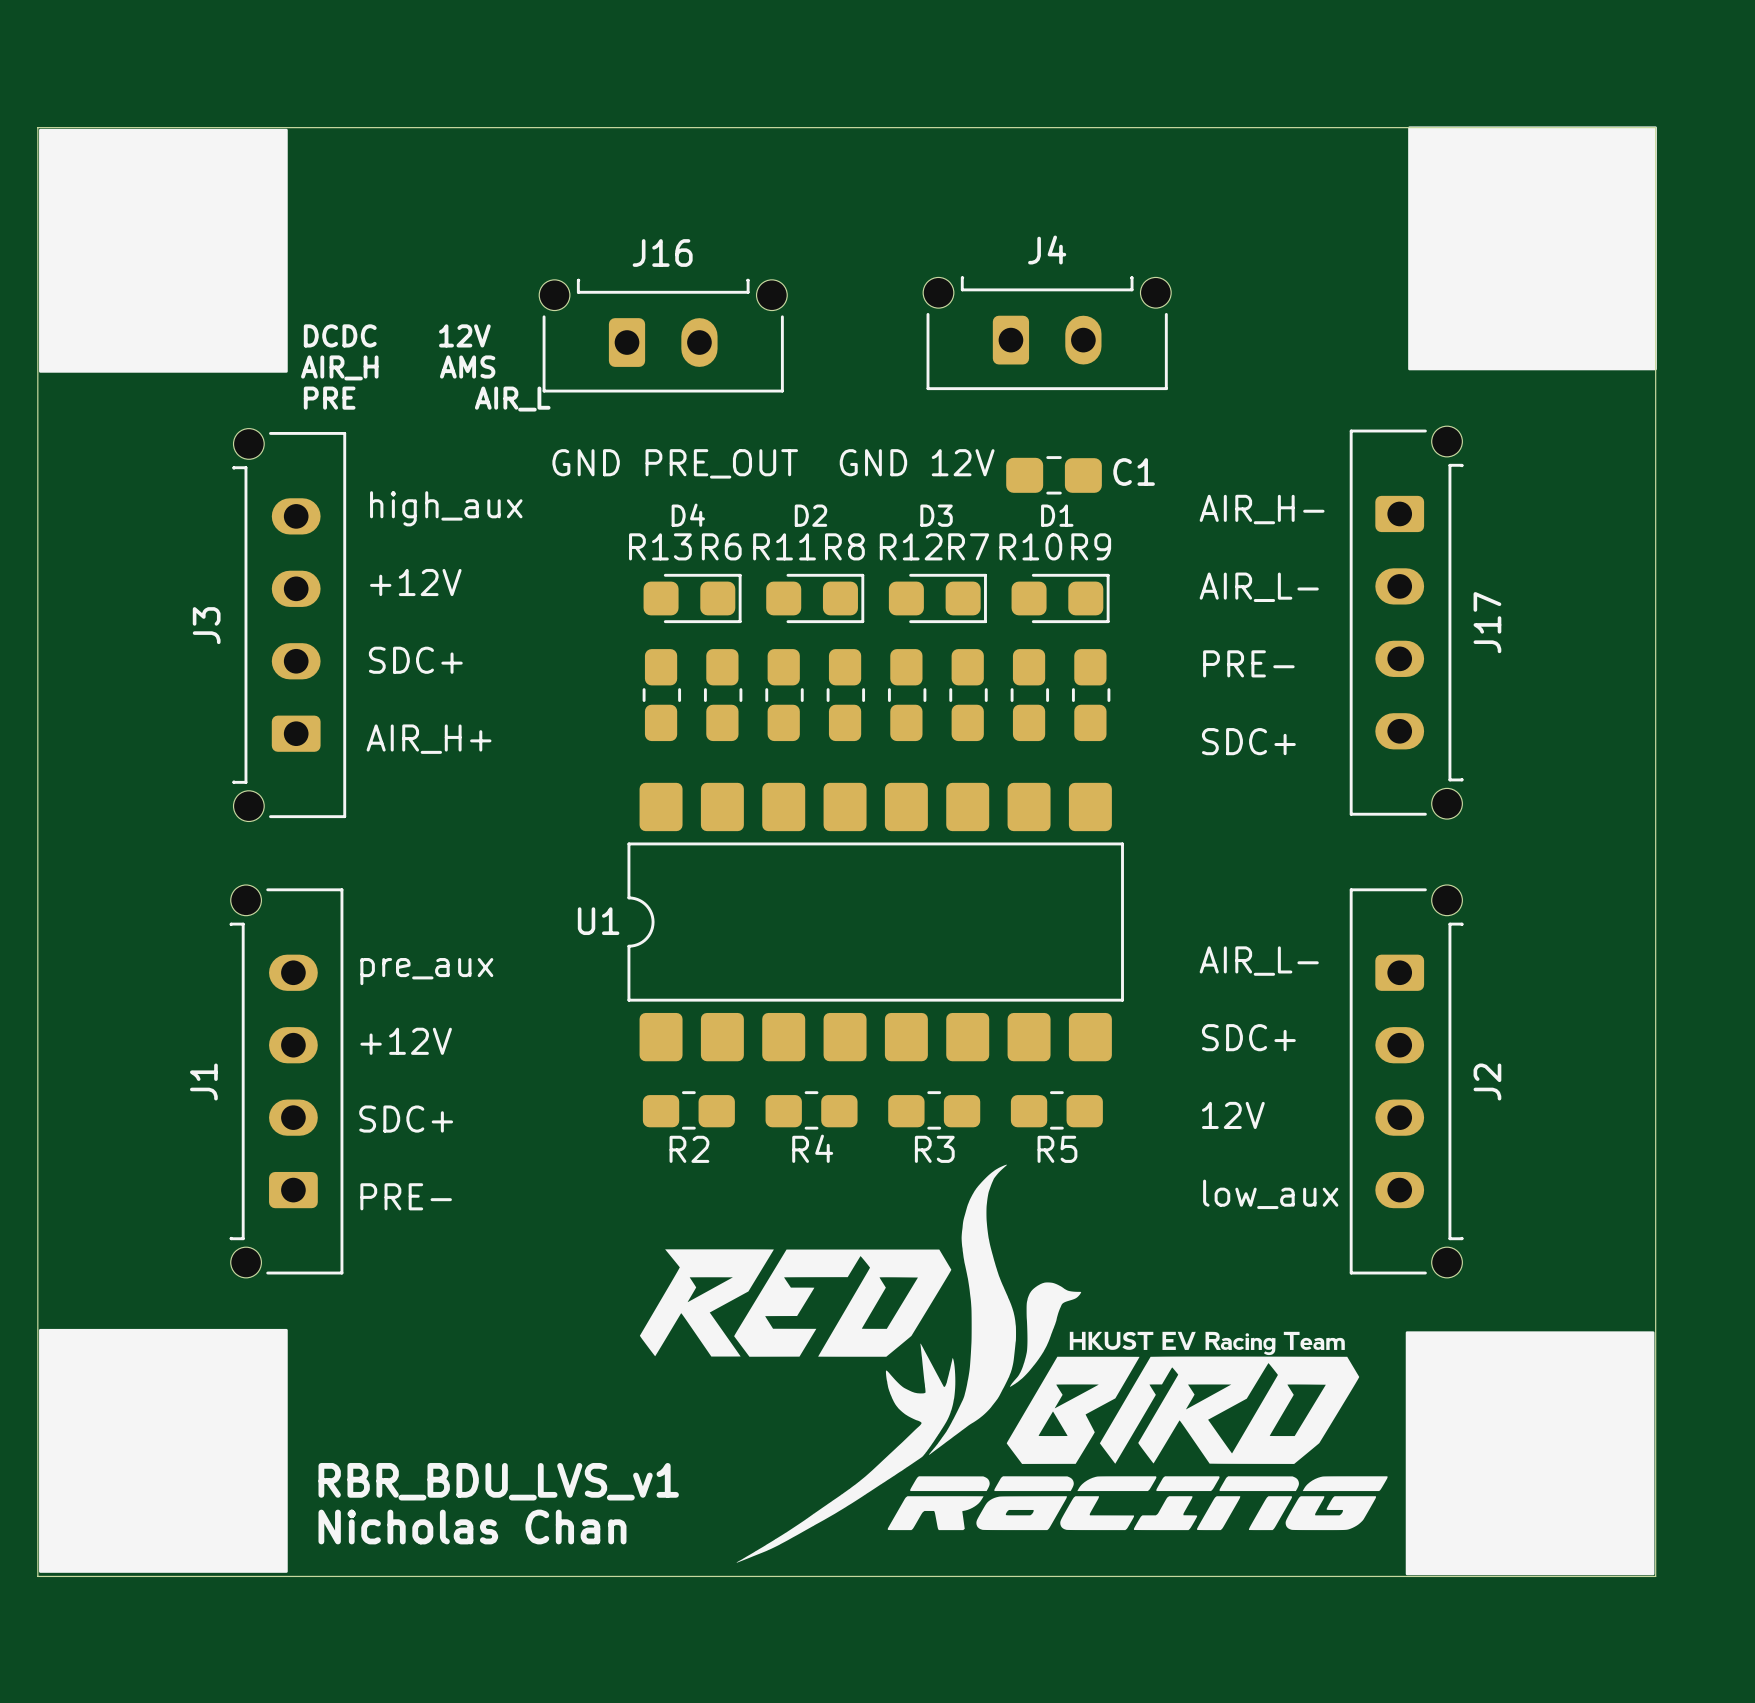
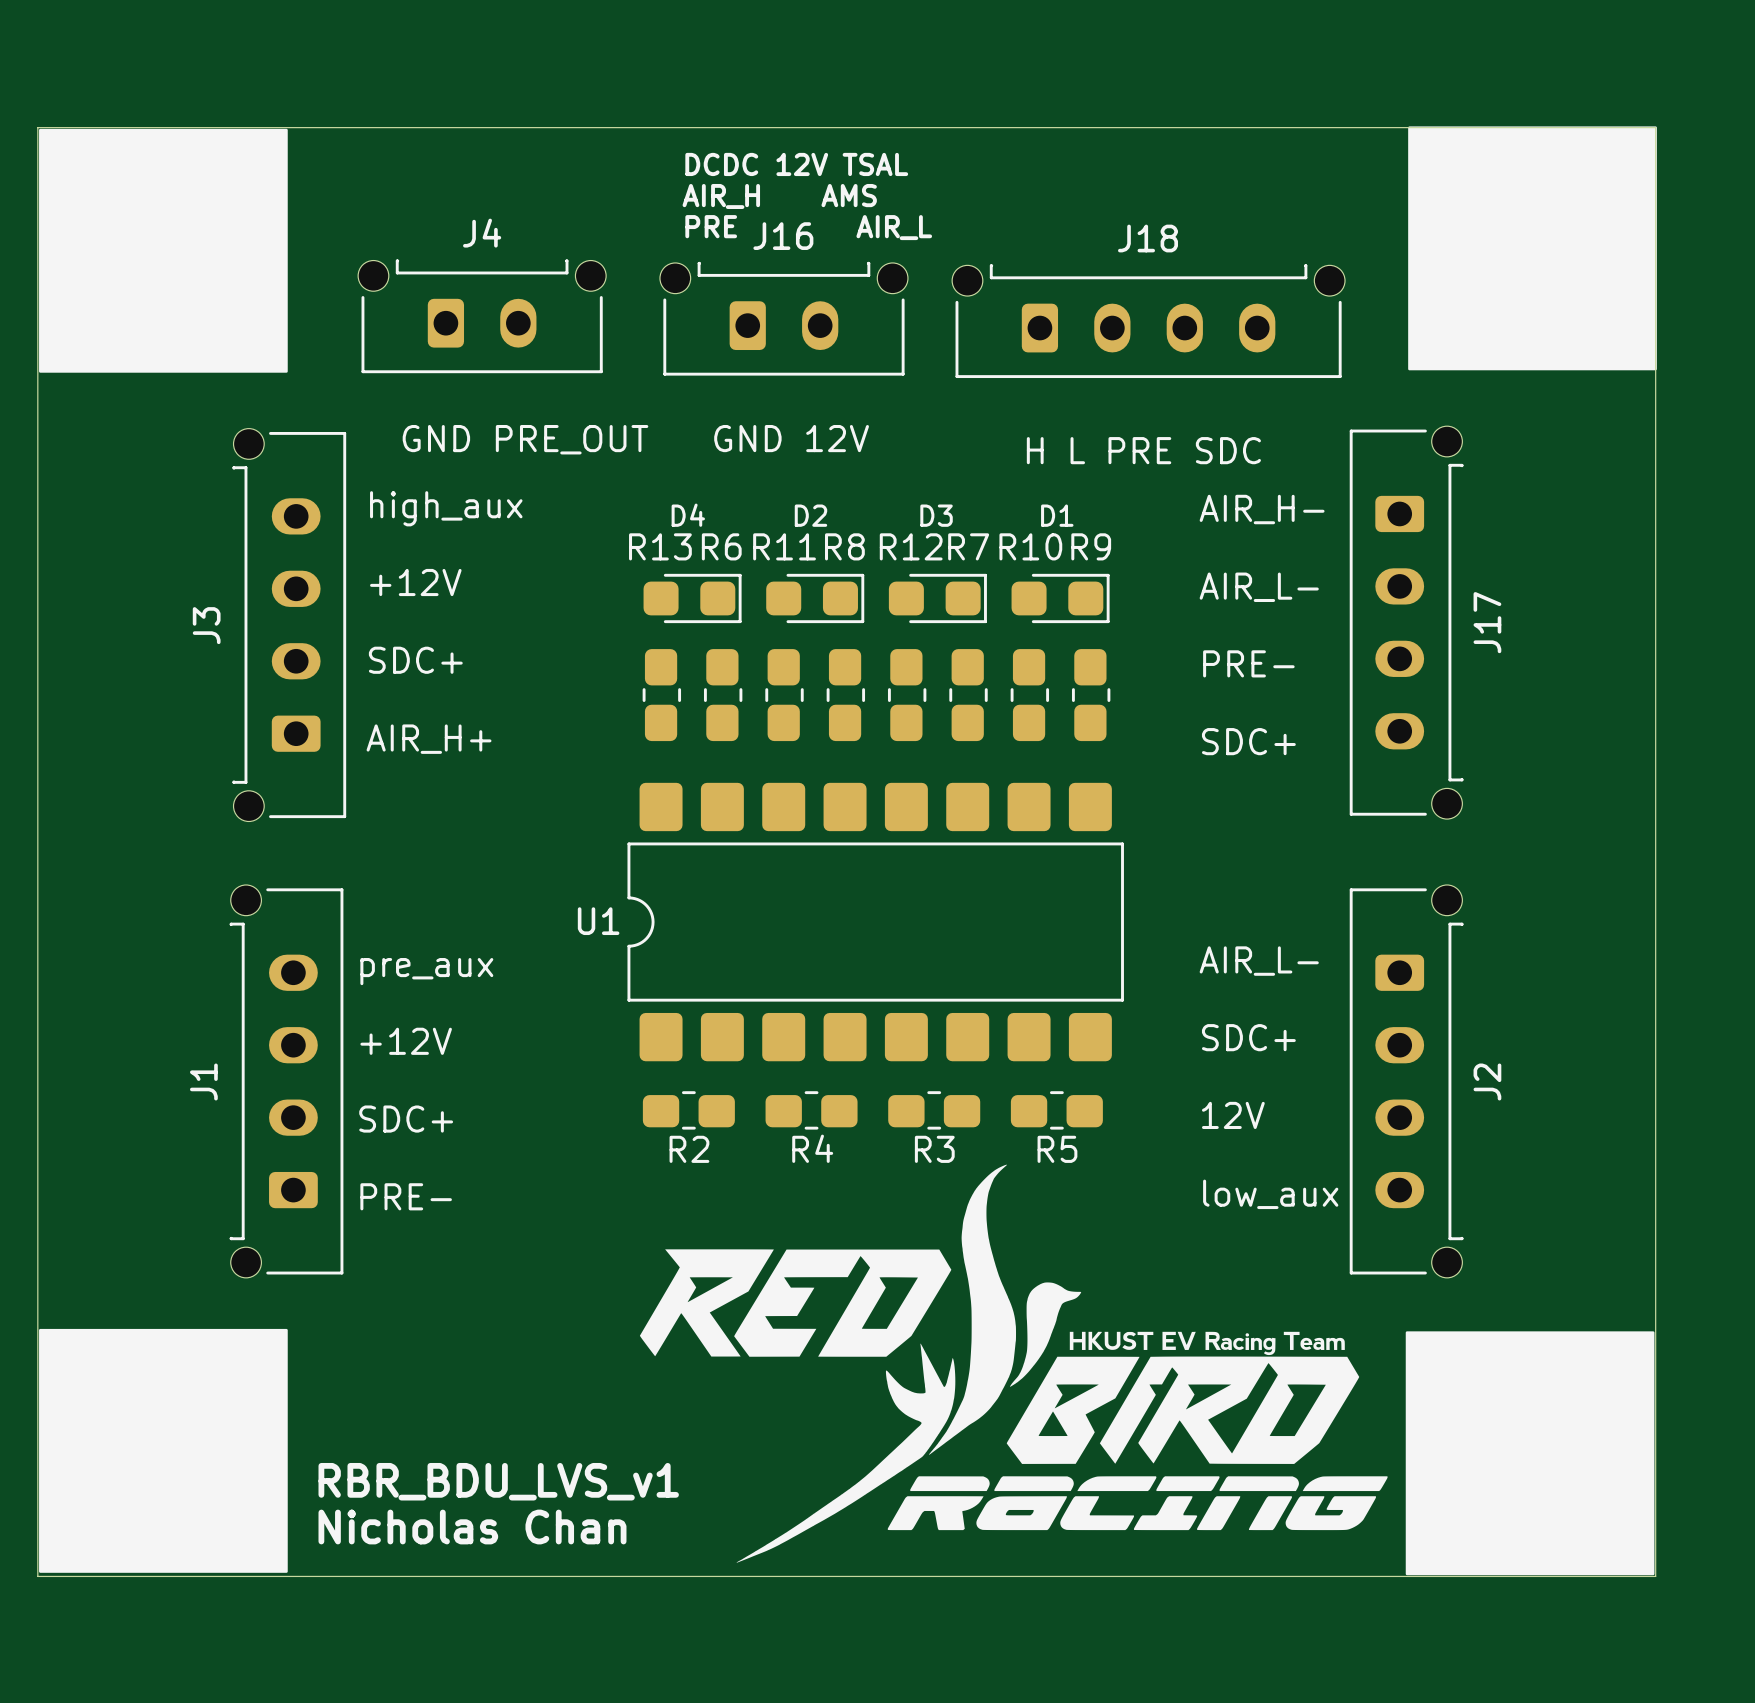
text: none -> DCDC 12V TSAL (796, 164)
J18: none -> (1148, 321)
J4 position: (1047, 333) -> (482, 316)
text: DCDC 12V (397, 335) -> none
J16 position: (663, 335) -> (783, 318)
text position: AIR_H AMS (398, 367) -> AIR_H AMS (779, 196)
text position: PRE AIR_L (427, 399) -> PRE AIR_L (808, 227)
text: none -> H L PRE SDC (1143, 450)
text position: GND 12V (917, 462) -> GND 12V (791, 438)
text position: GND PRE_OUT (675, 463) -> GND PRE_OUT (525, 439)
C1: (1054, 475) -> none

